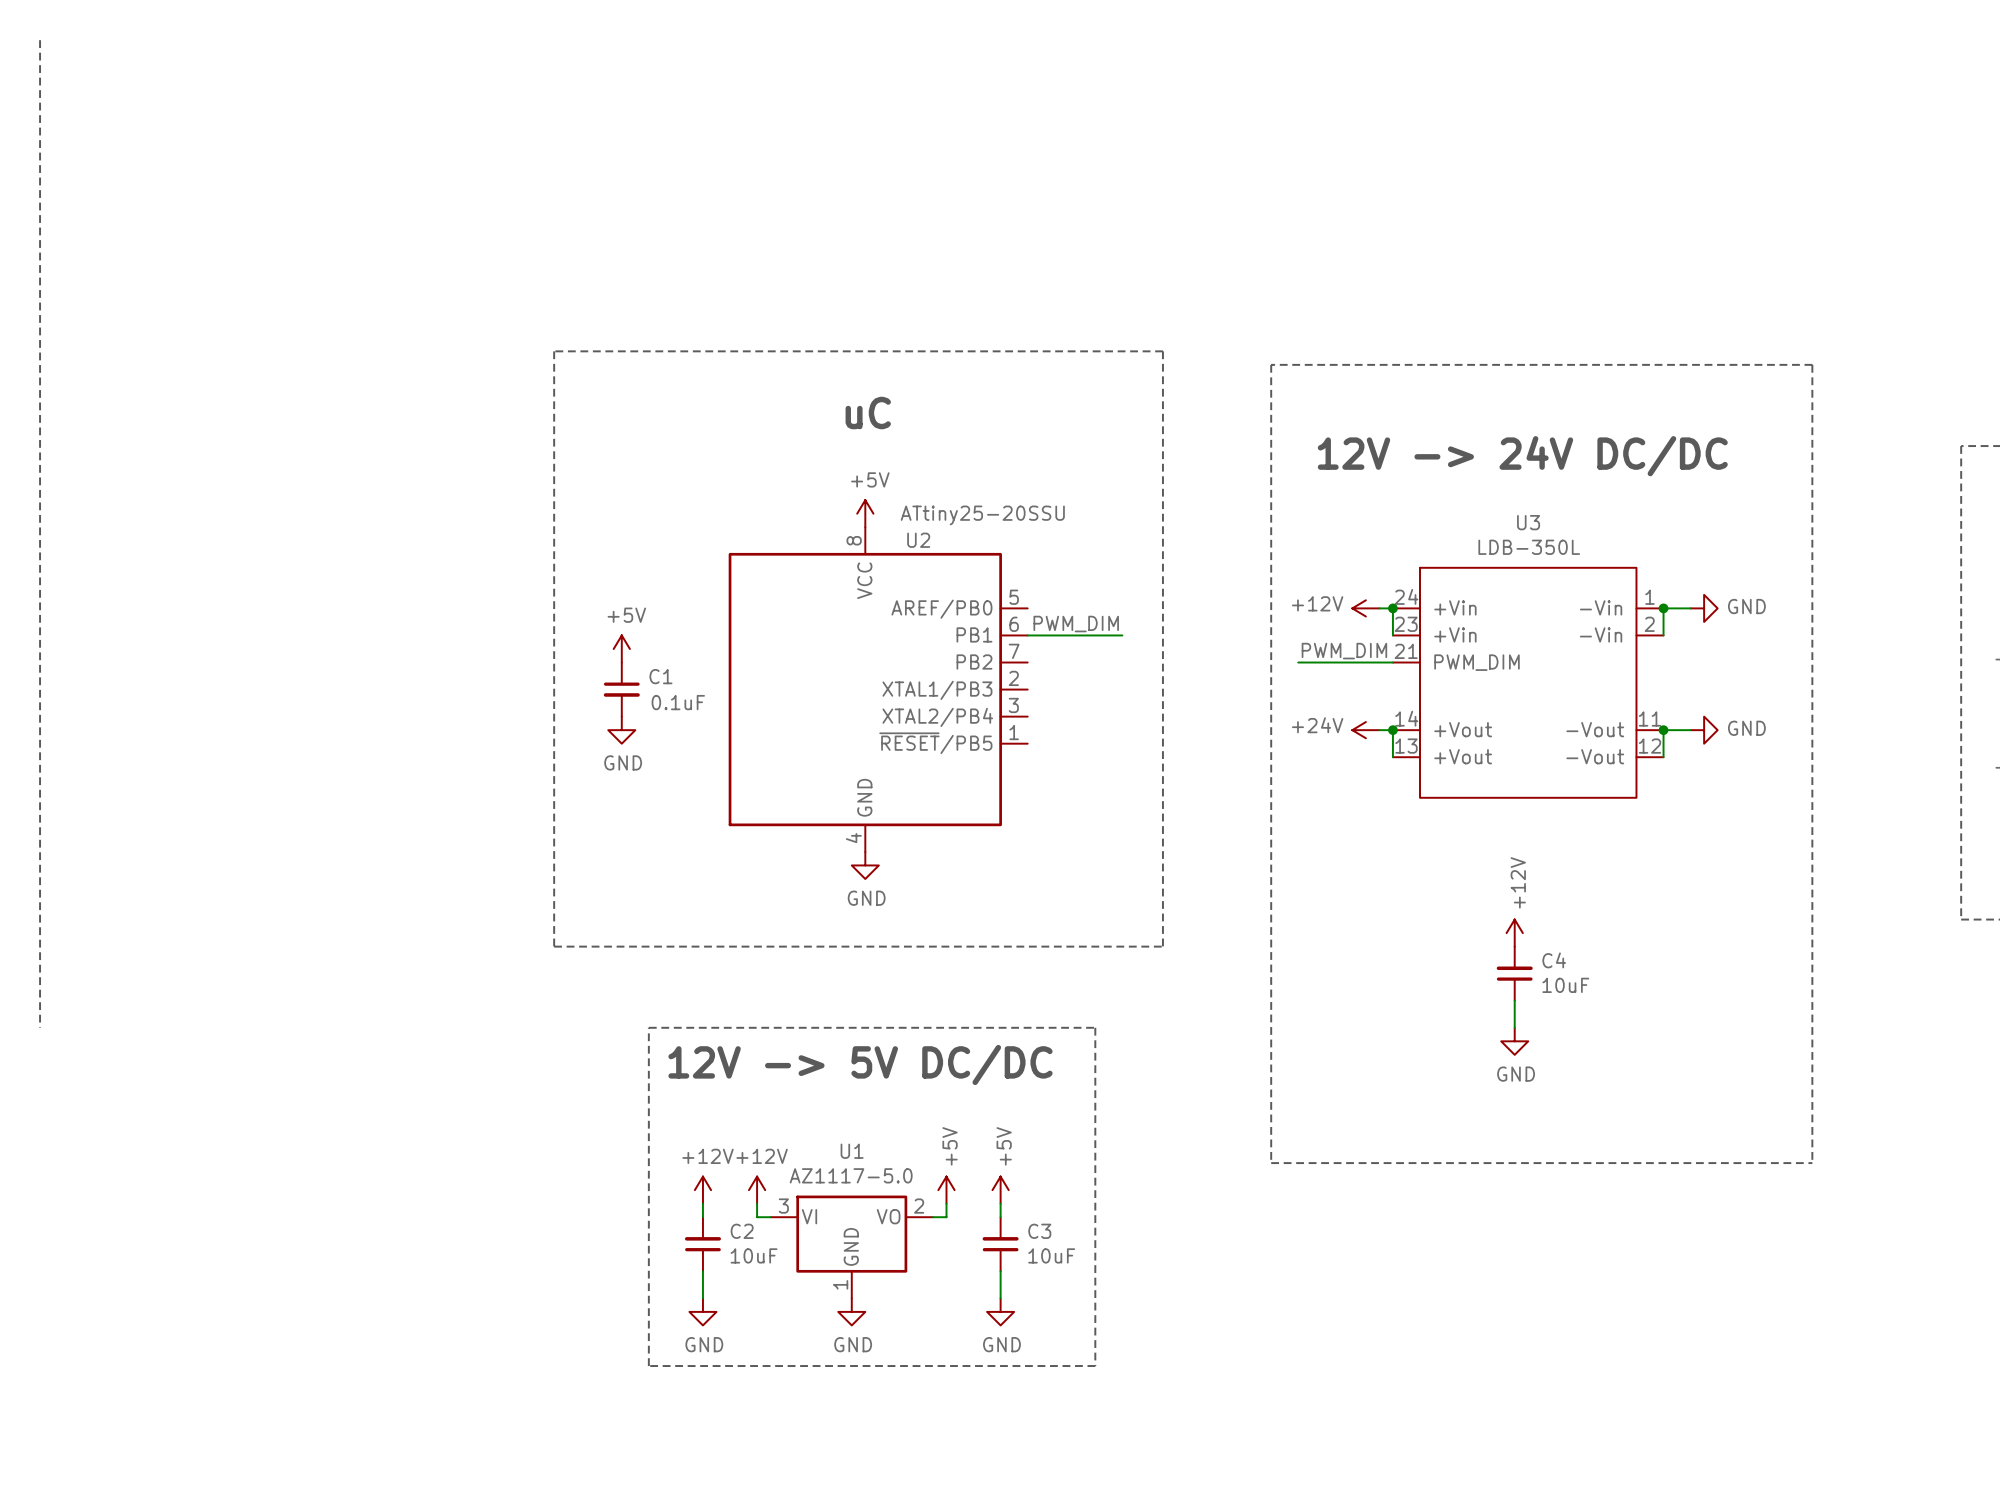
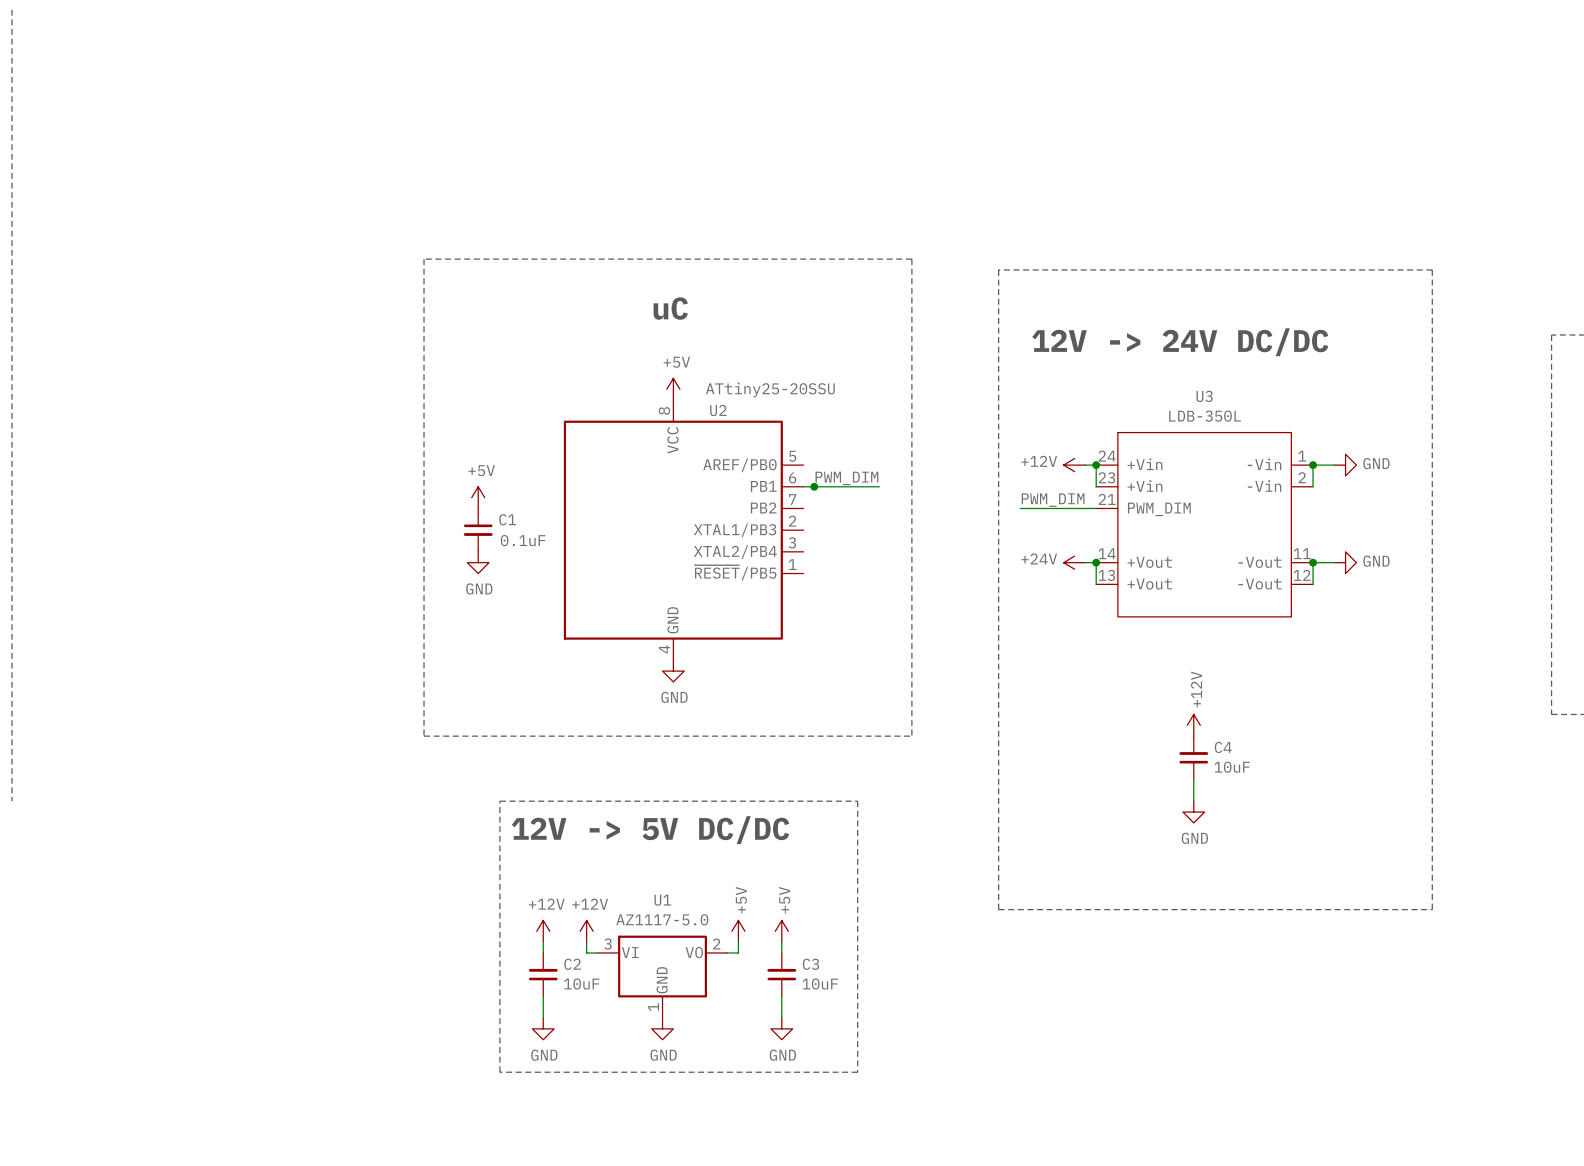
junction: none -> (814, 486)

